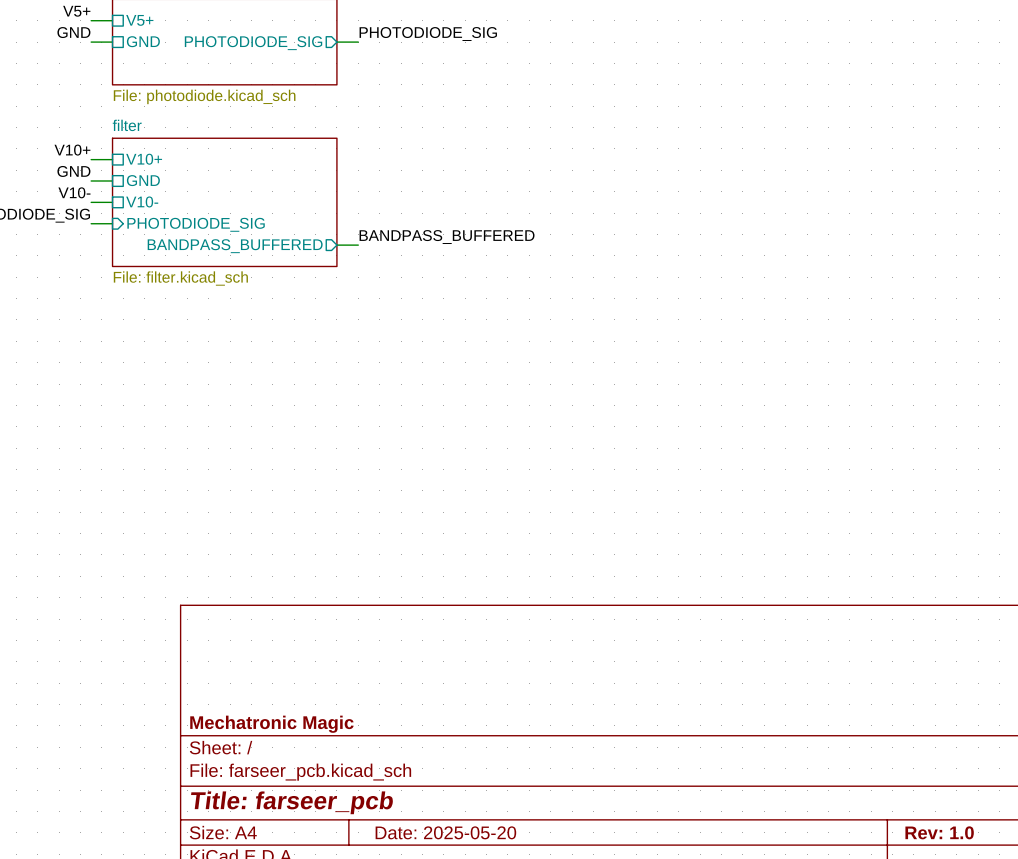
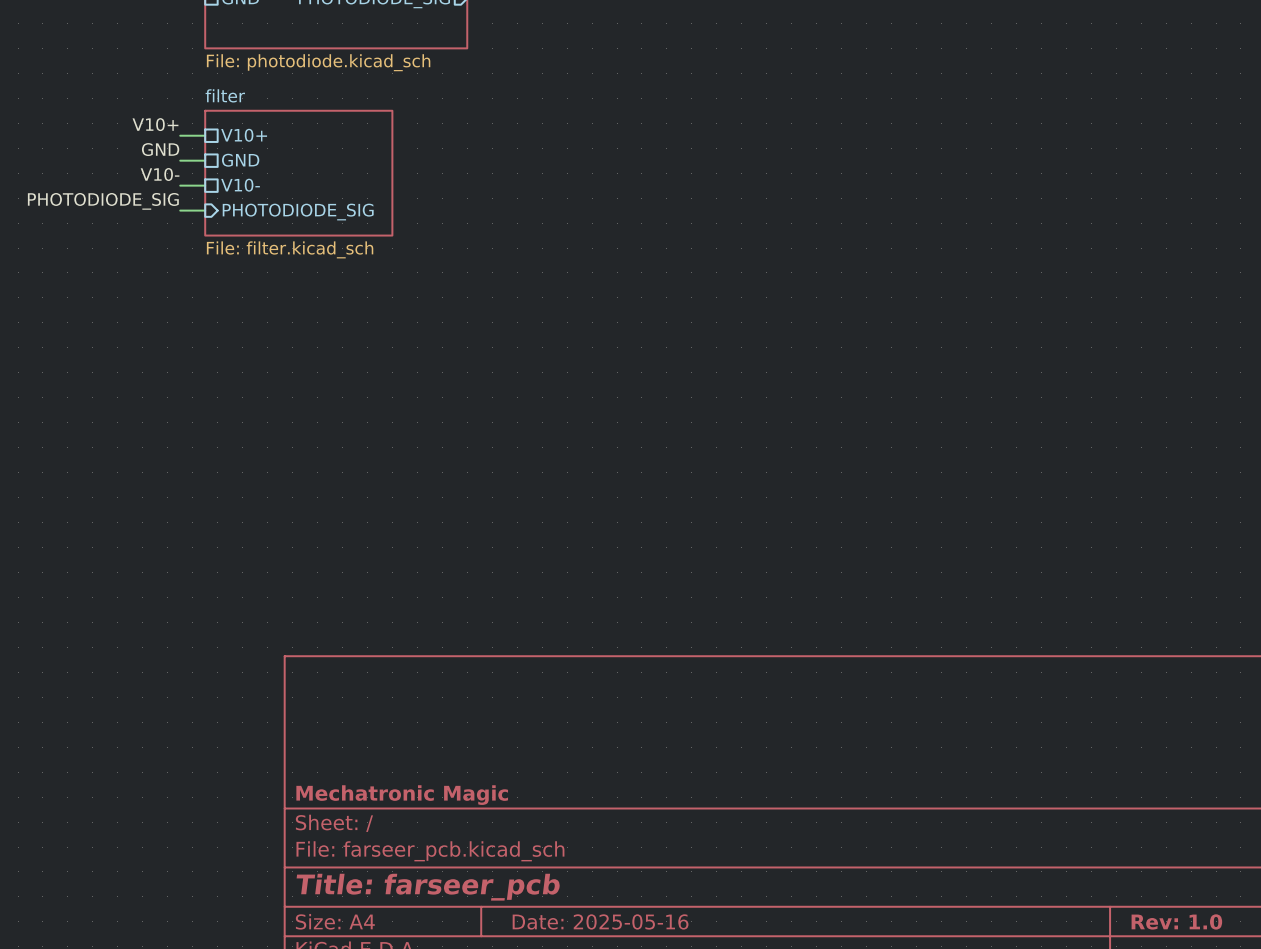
sheet filter: none -> File: filter.kicad_sch (298, 173)
sheet filter: File: filter.kicad_sch (224, 202) -> none
label: BANDPASS_BUFFERED (447, 237) -> none
wire: (336, 245) (358, 245) -> none
sheet pin: BANDPASS_BUFFERED (235, 246) -> none
title block: Date: 2025-05-20 (445, 832) -> Date: 2025-05-16 (600, 921)

